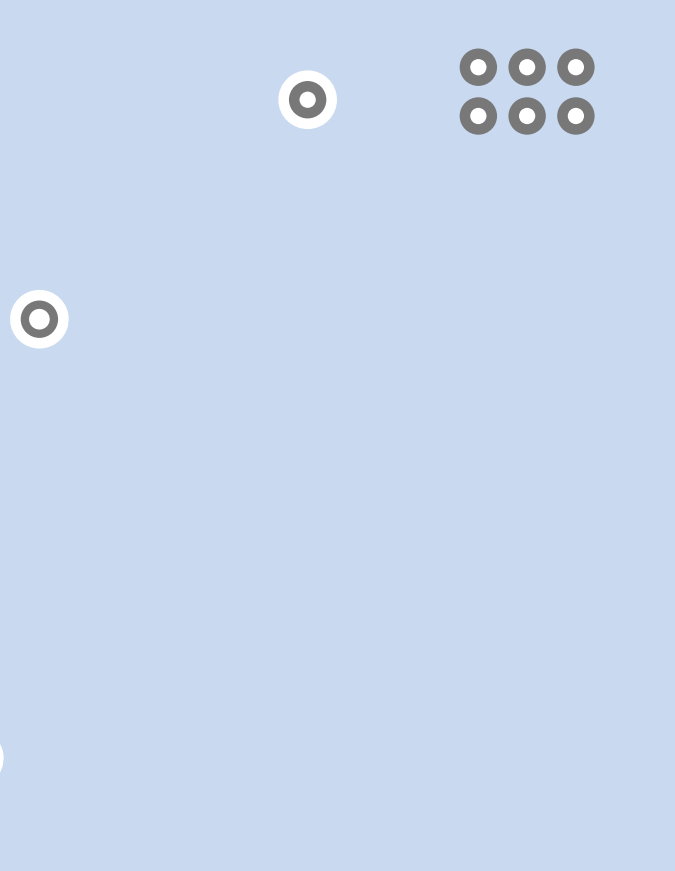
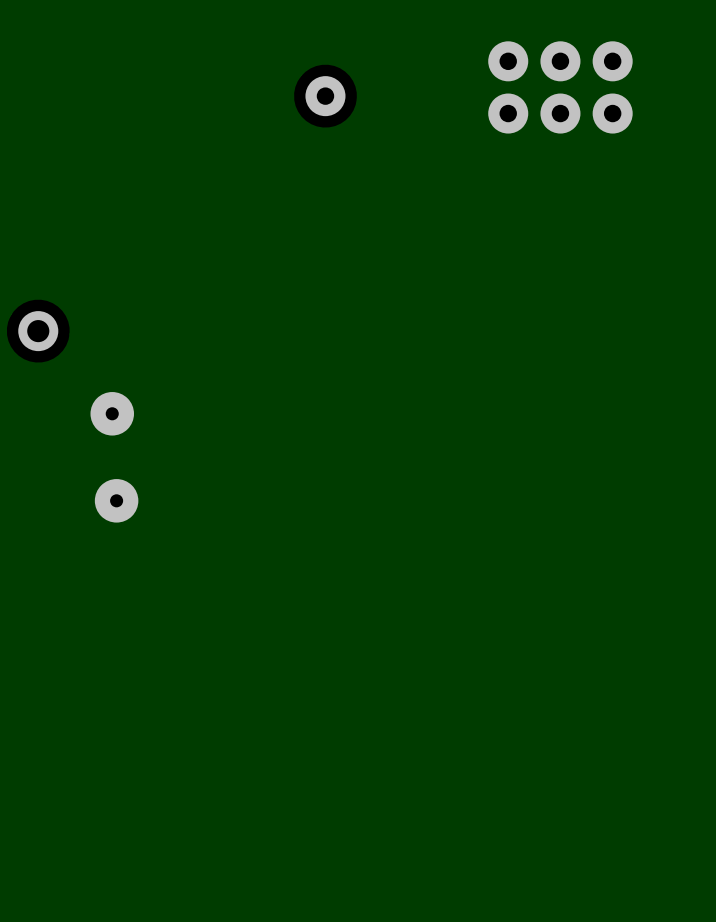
via: none -> (112, 413)
via: none -> (116, 500)

